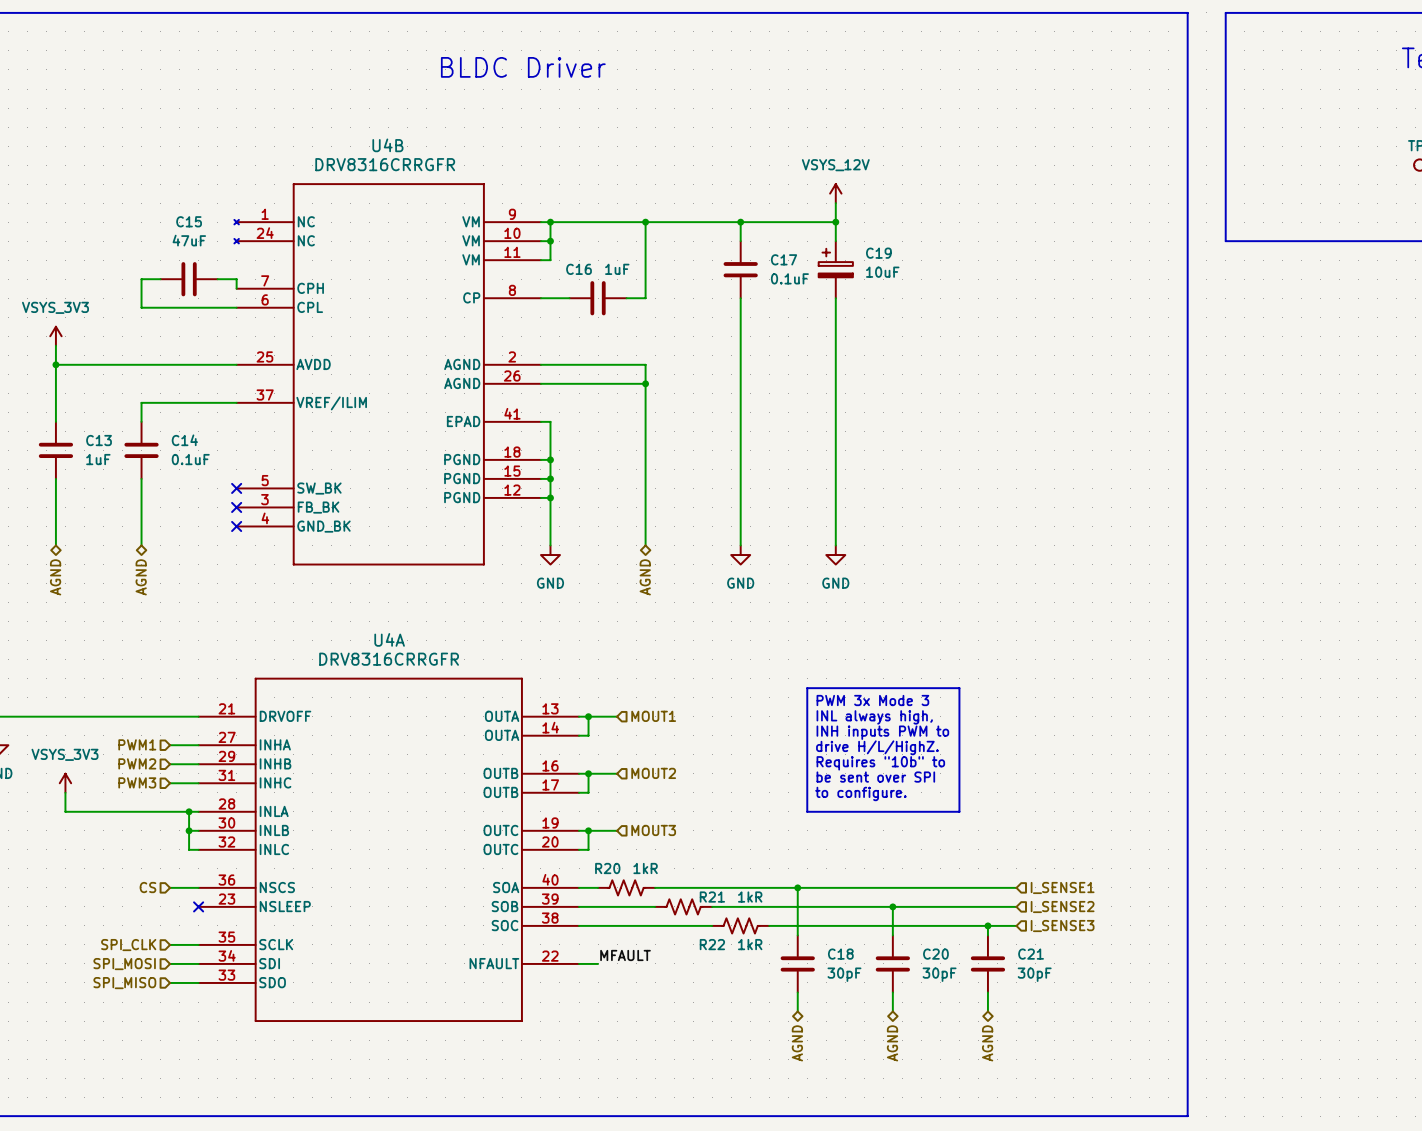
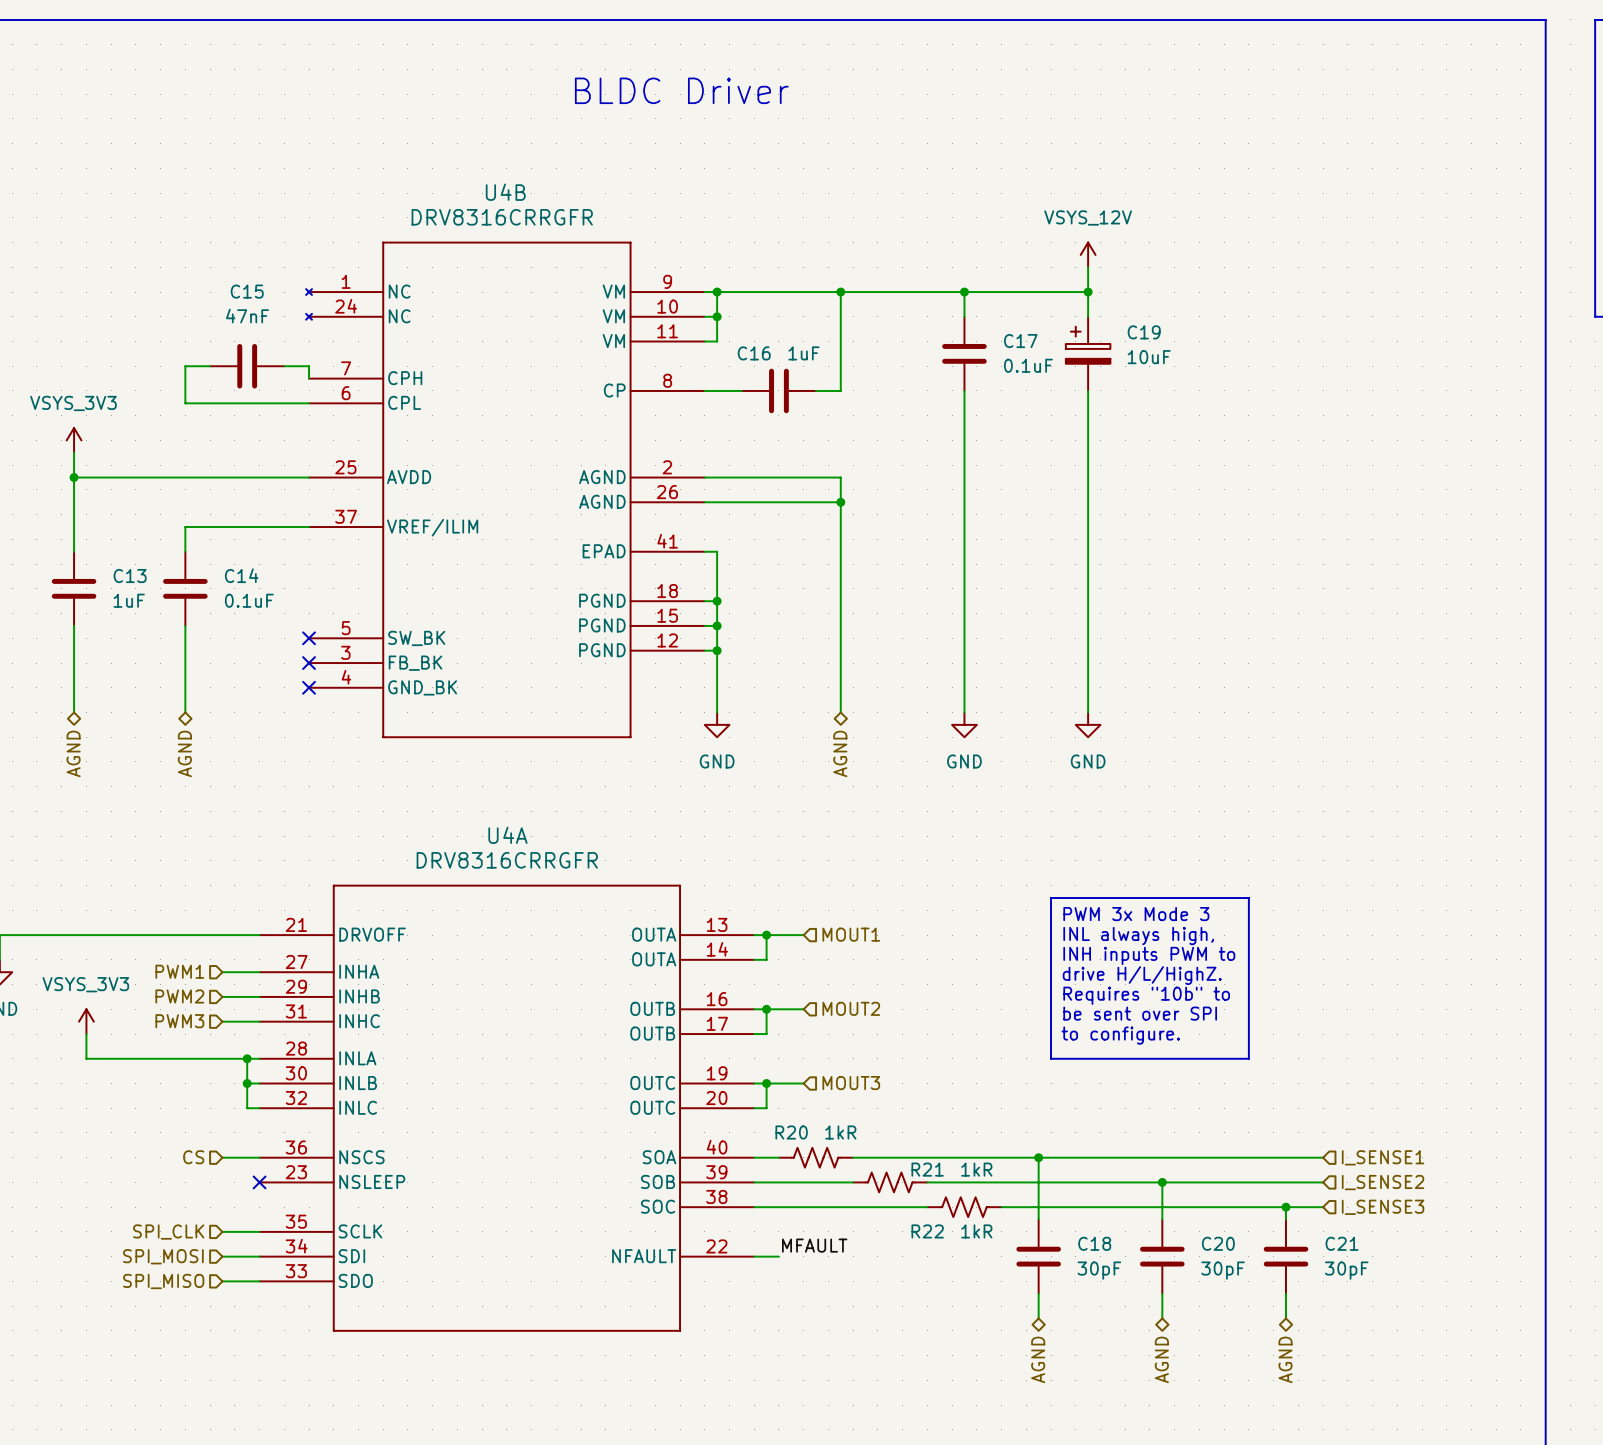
C15 value: 47uF (189, 240) -> 47nF (247, 316)

